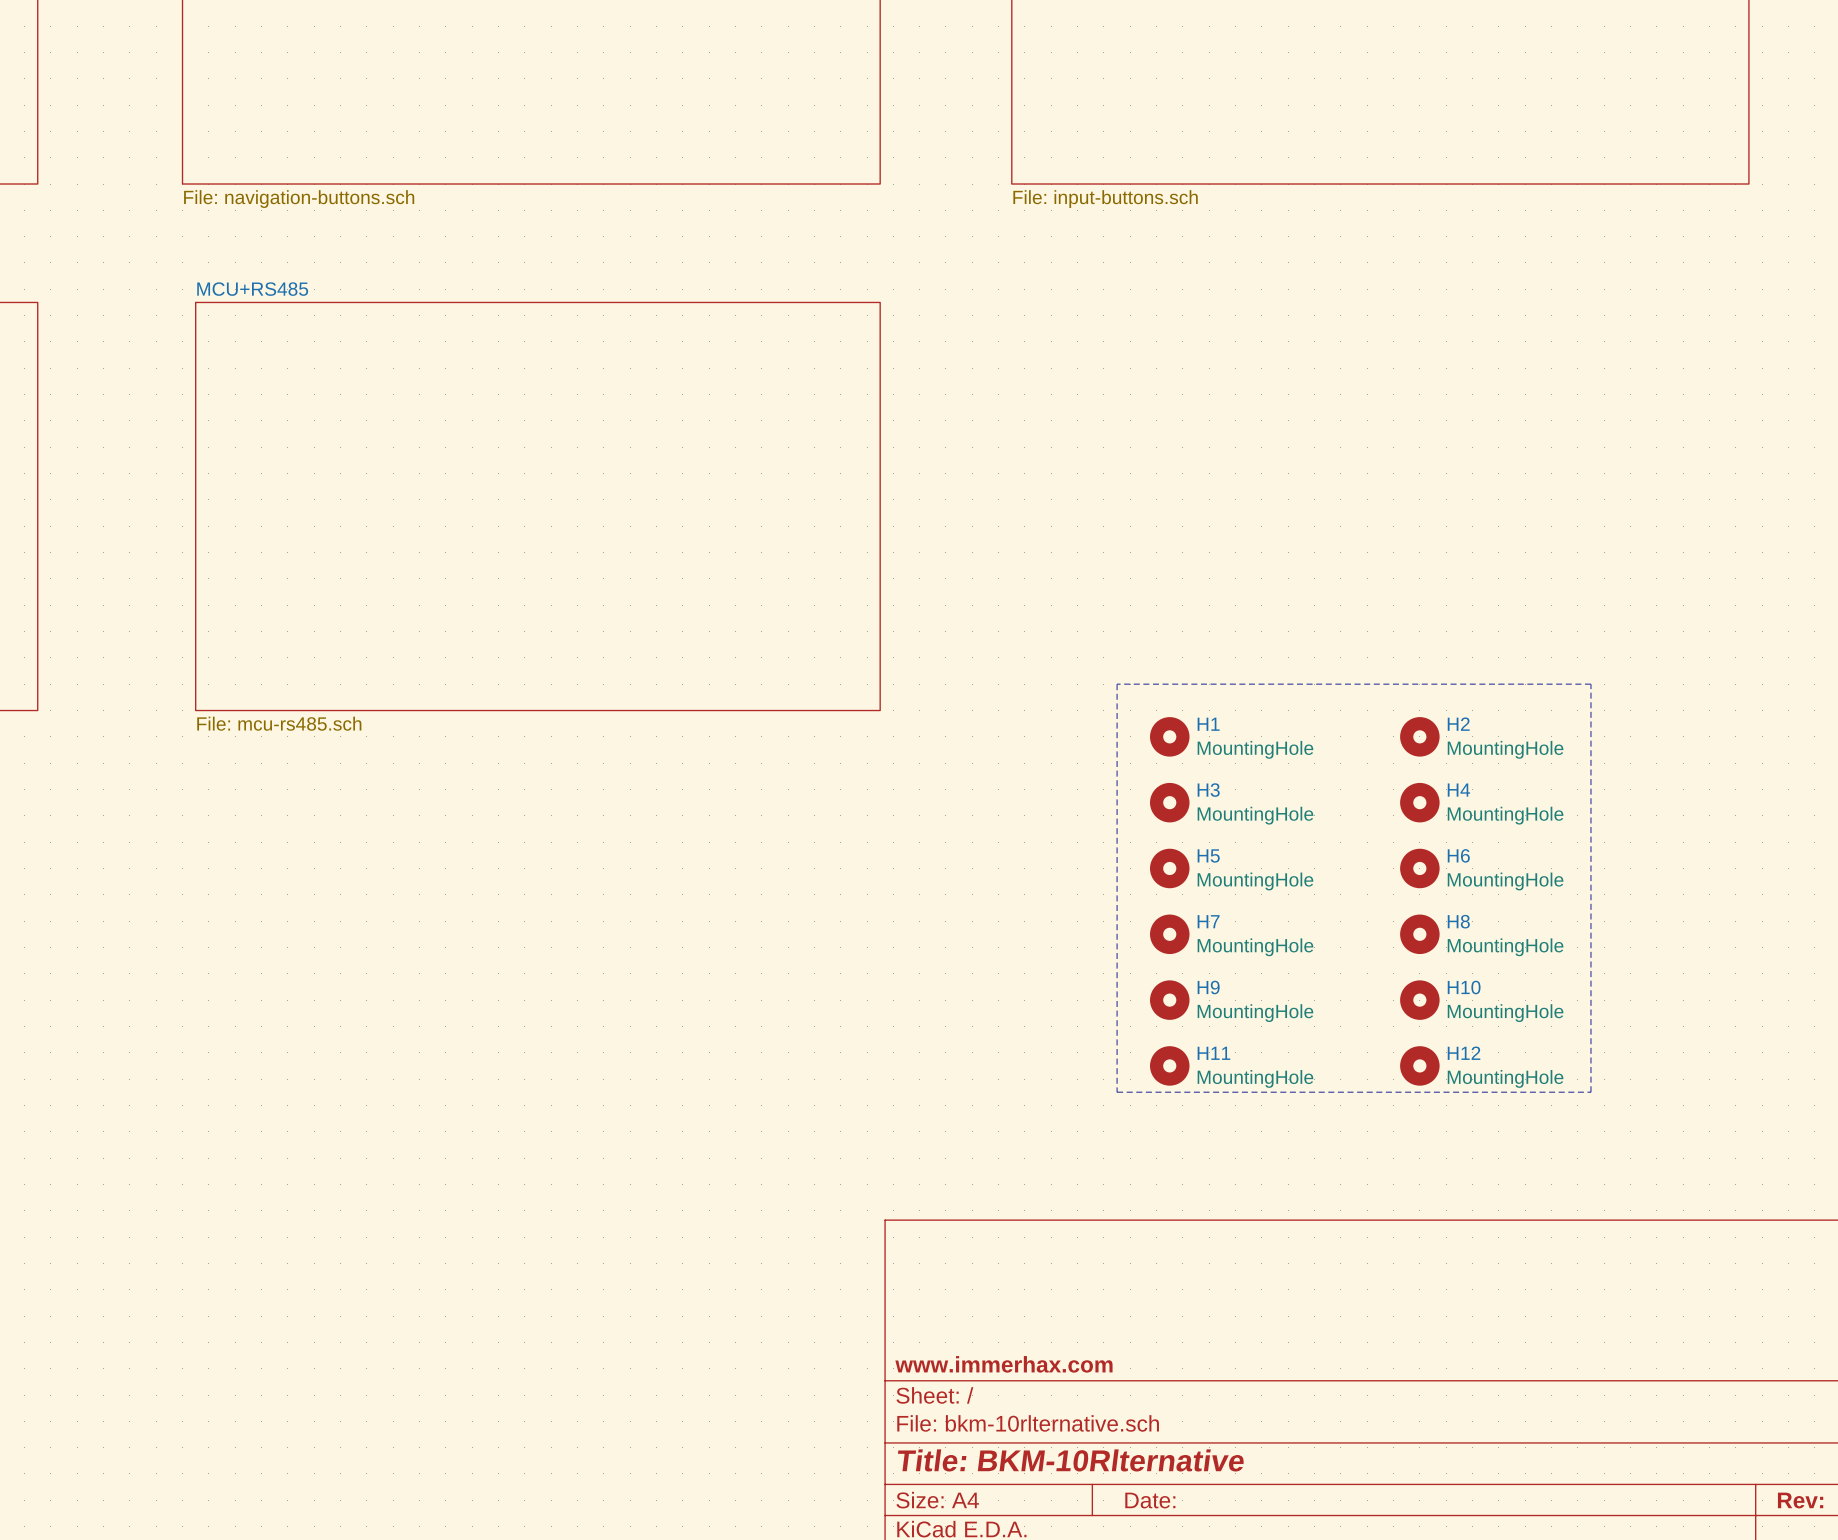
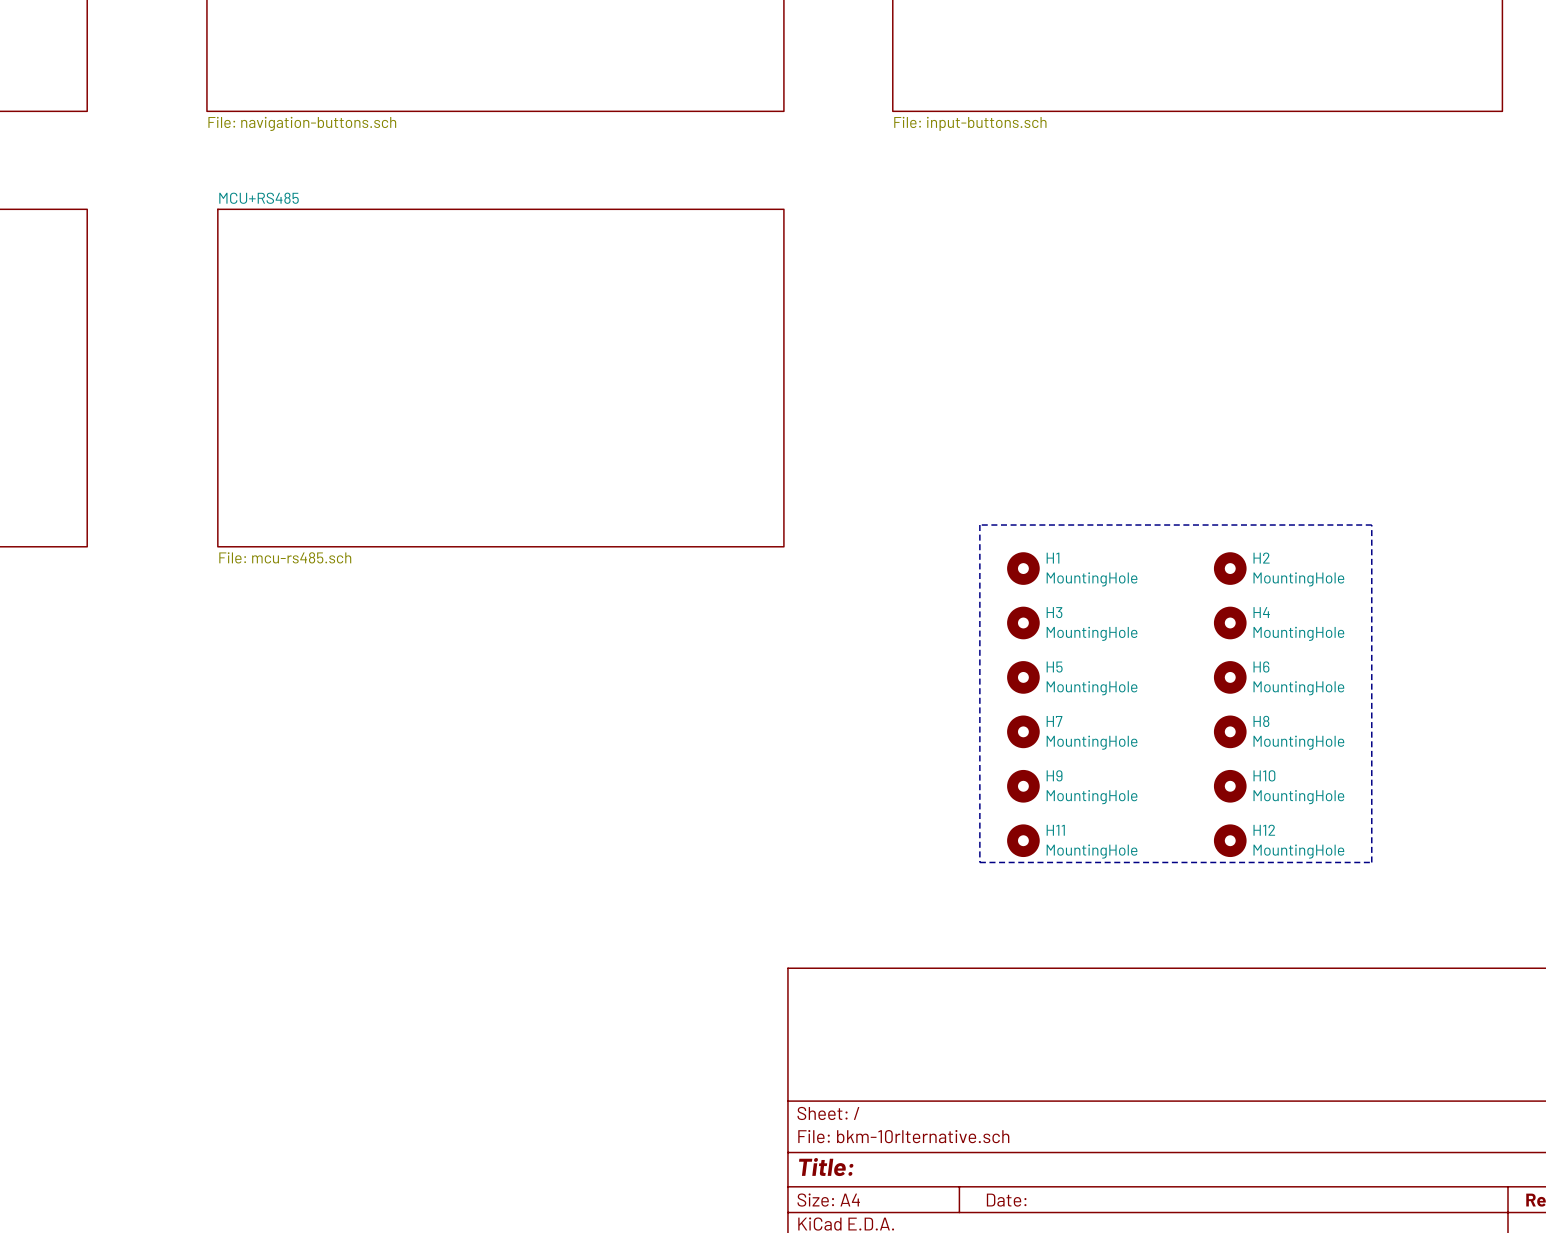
title block: www.immerhax.com (1003, 1364) -> none
title block: Title: BKM-10Rlternative (1071, 1460) -> Title: (826, 1167)

